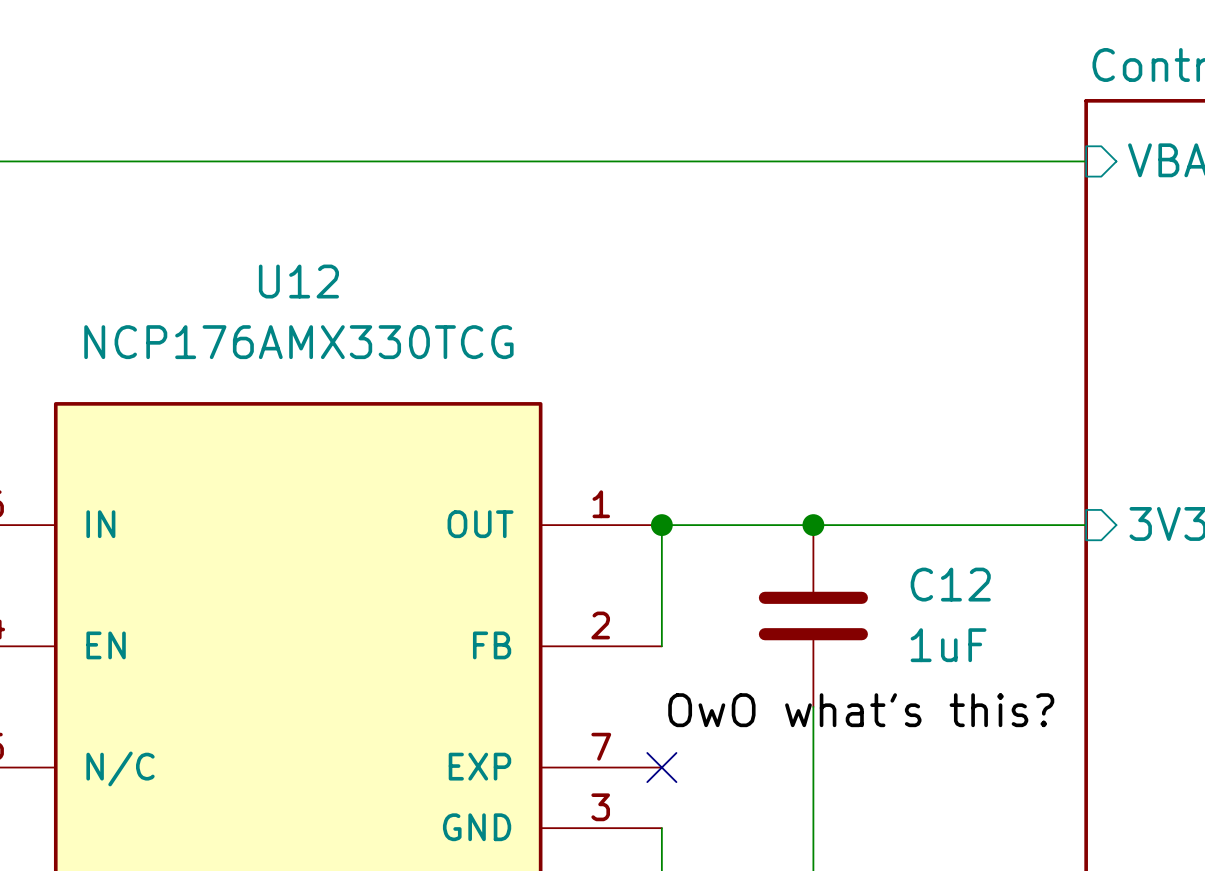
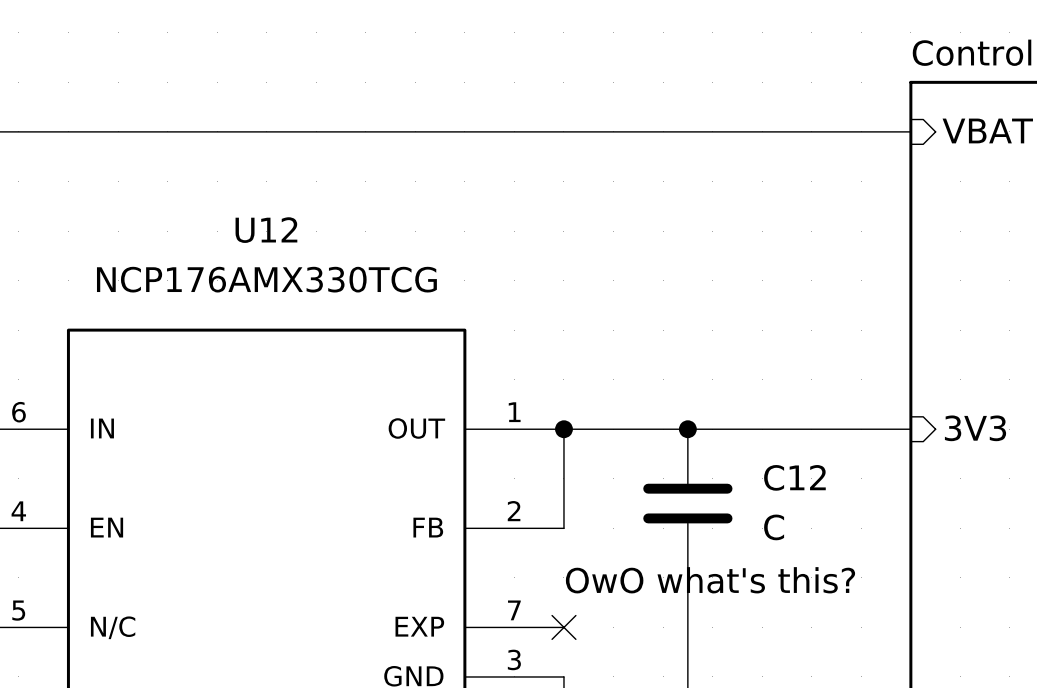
C12 value: 1uF (948, 645) -> C (774, 527)

